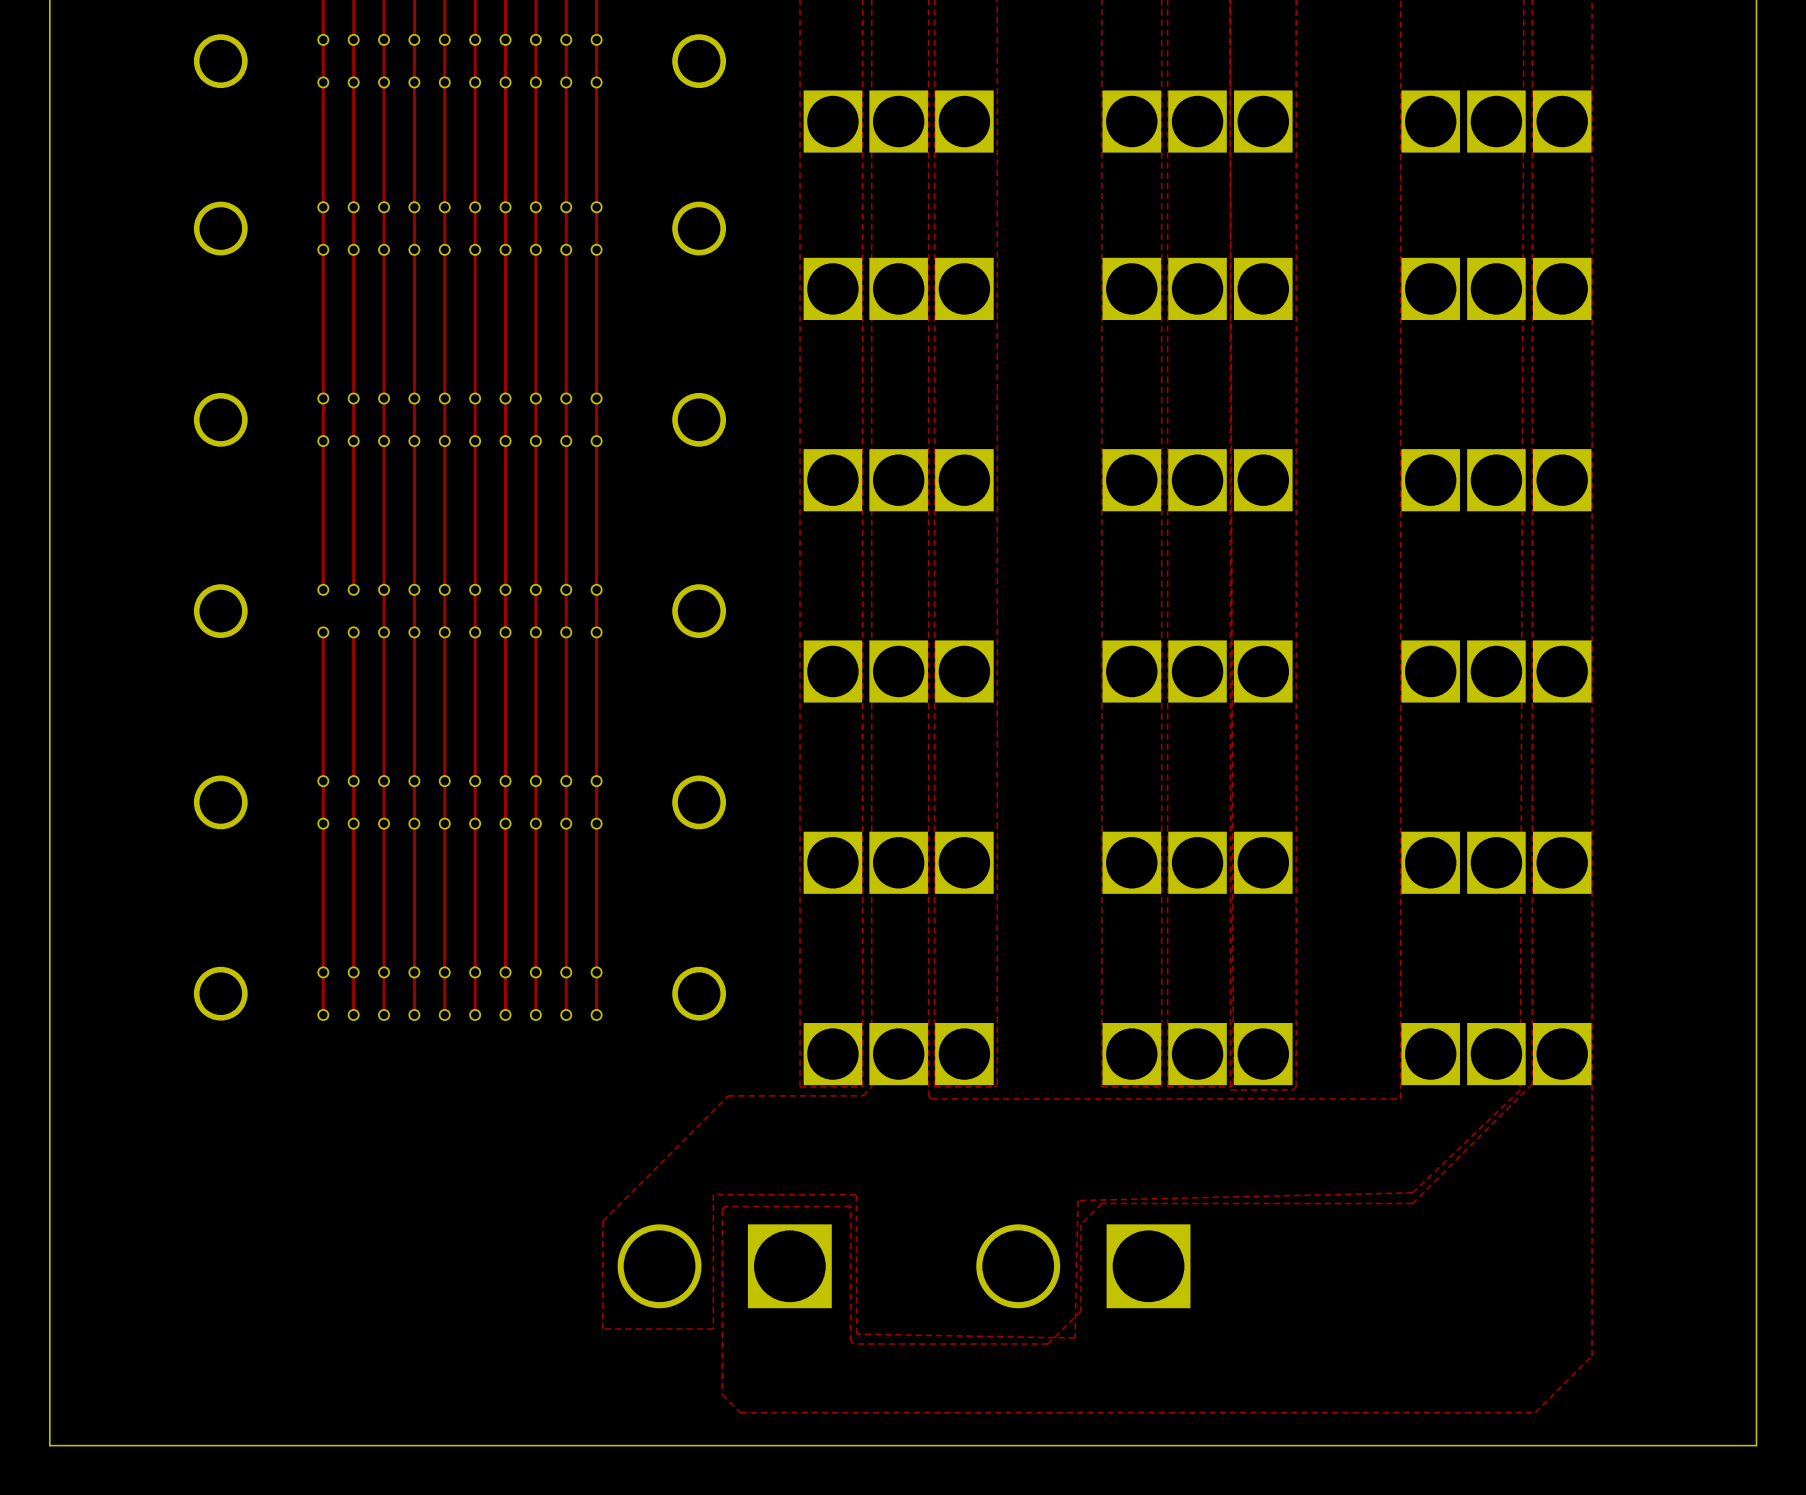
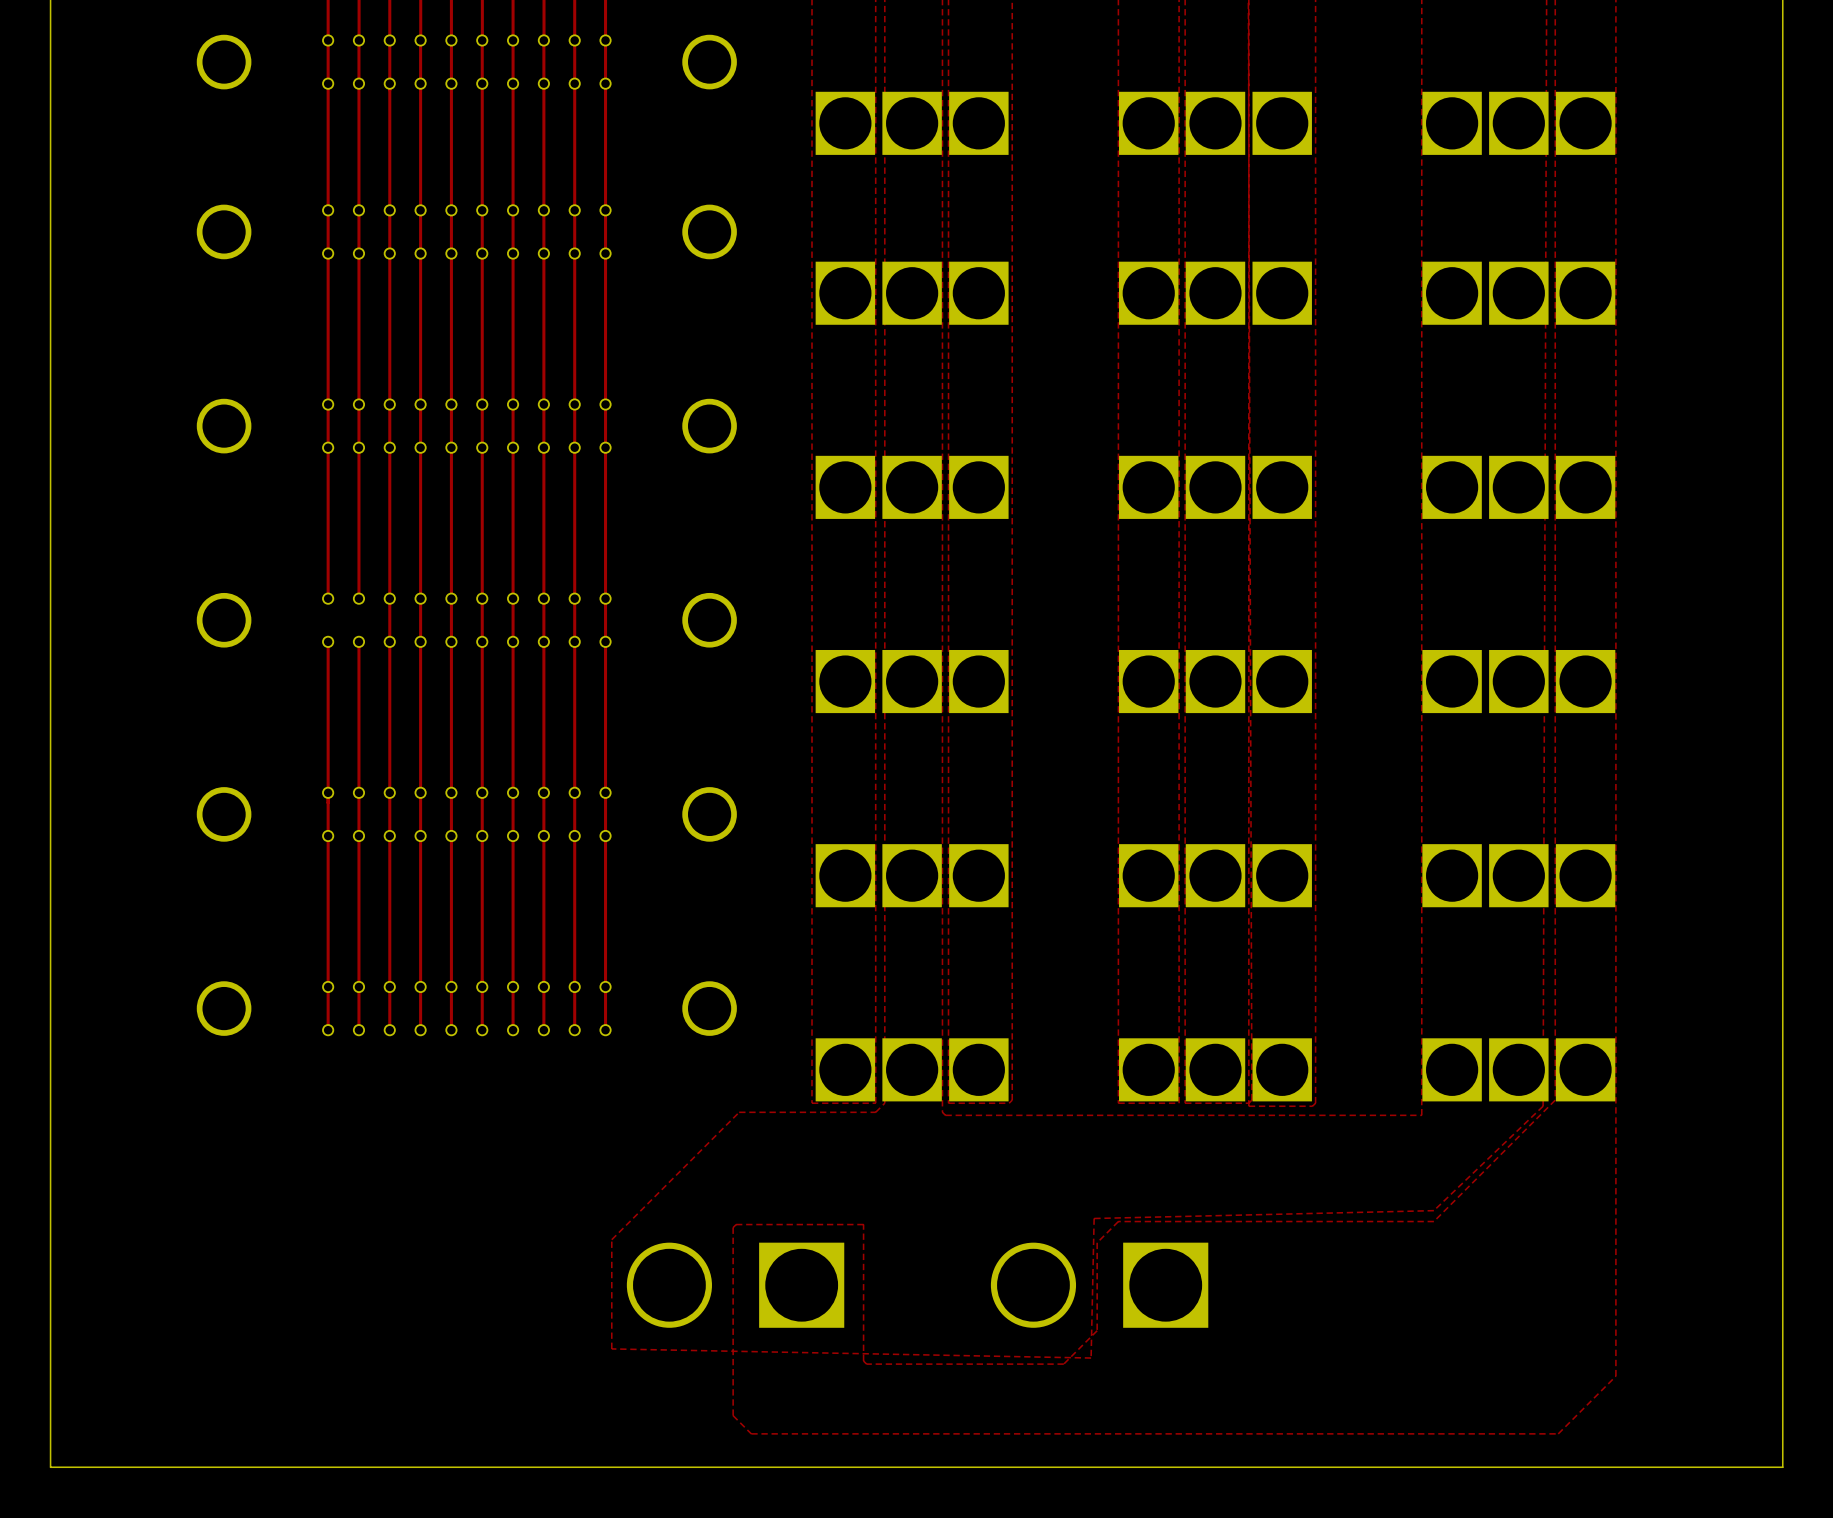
top zone outline: (602, 1329) (713, 1329) (713, 1194) (856, 1194) (856, 1334) (1075, 1338) -> (611, 1348) (1091, 1358)

